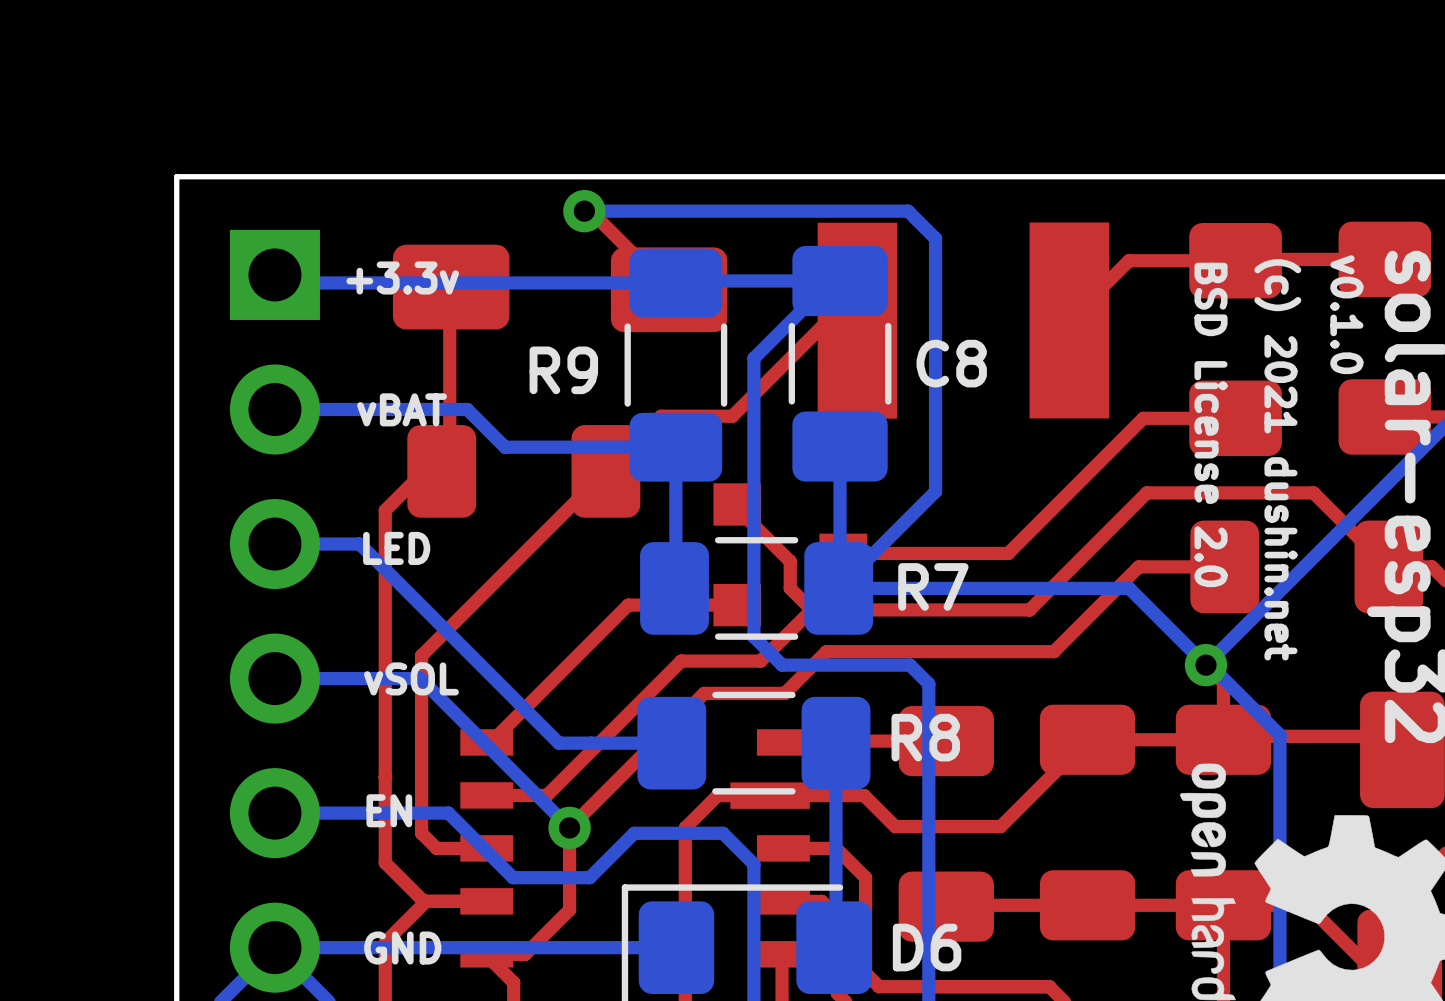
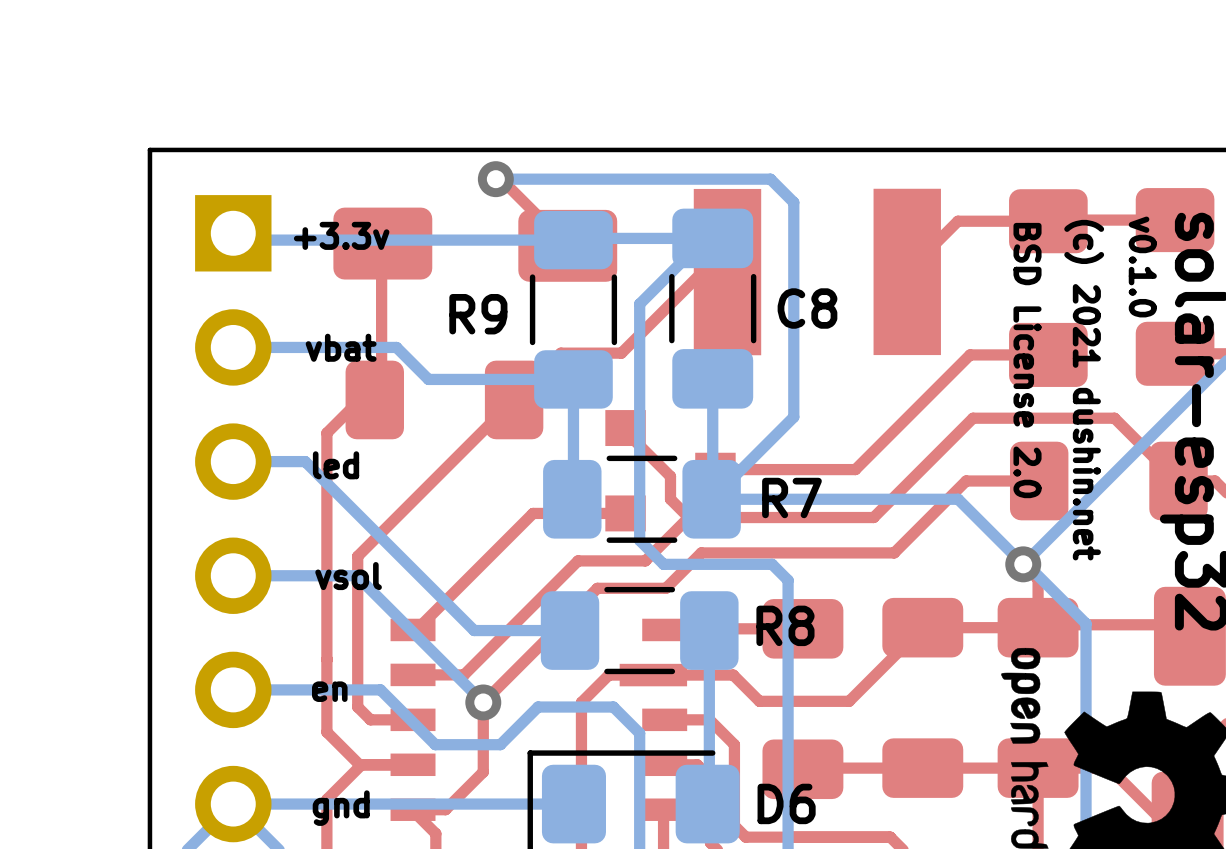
text: vBAT (402, 409) -> vbat (341, 347)
text: LED (396, 548) -> led (336, 465)
text: vSOL (411, 678) -> vsol (348, 576)
text: EN (389, 810) -> en (329, 691)
text: GND (402, 948) -> gnd (341, 808)

